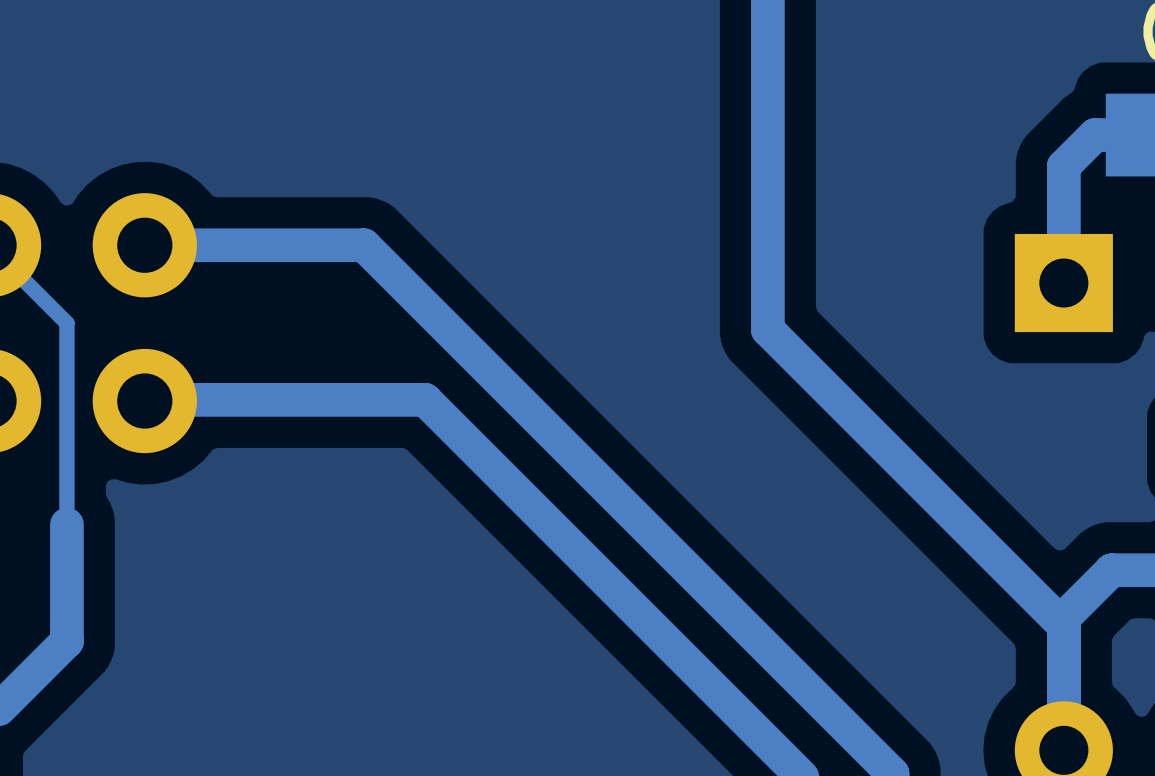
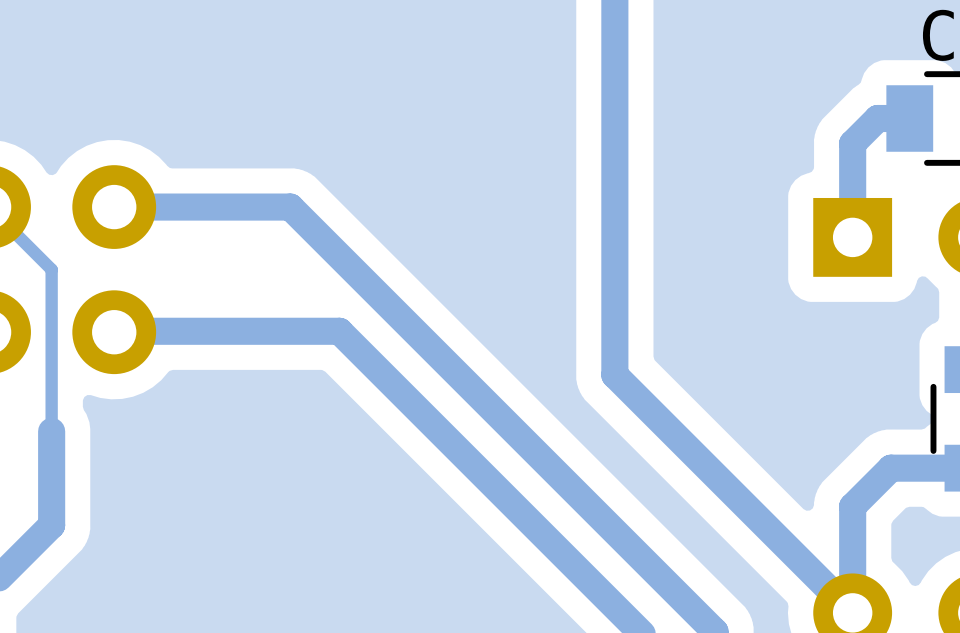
track: (767, 329) (1063, 625) -> (614, 274) (614, 375) (852, 612)

